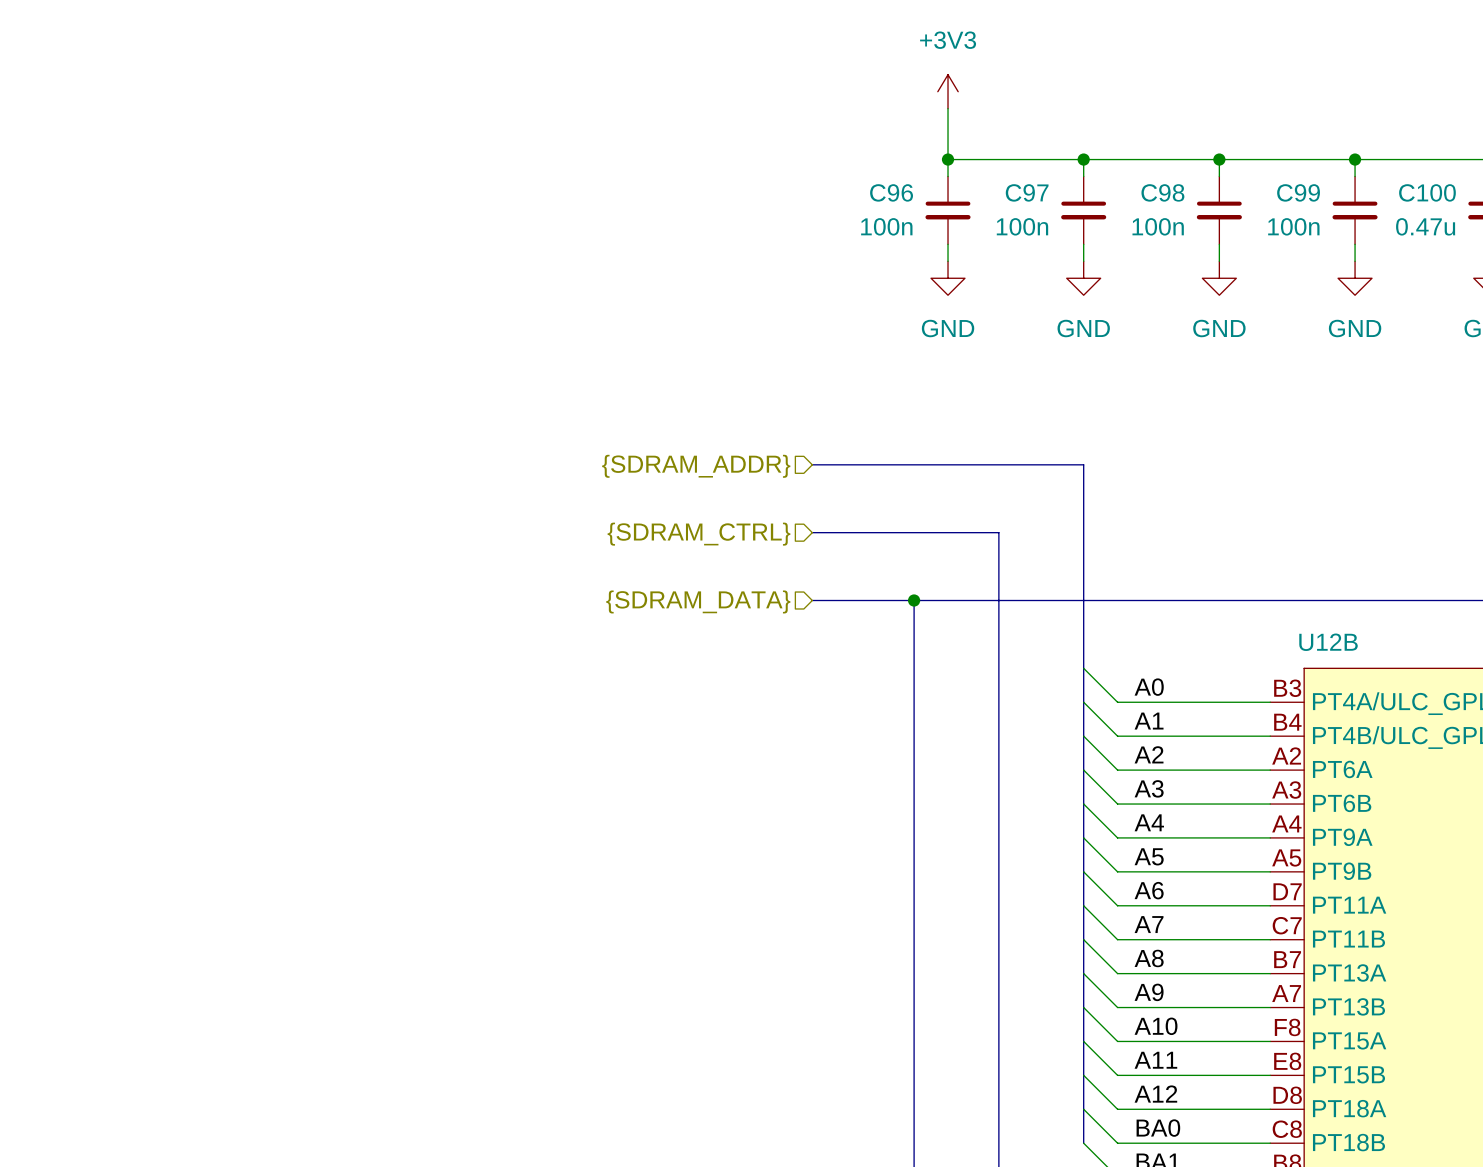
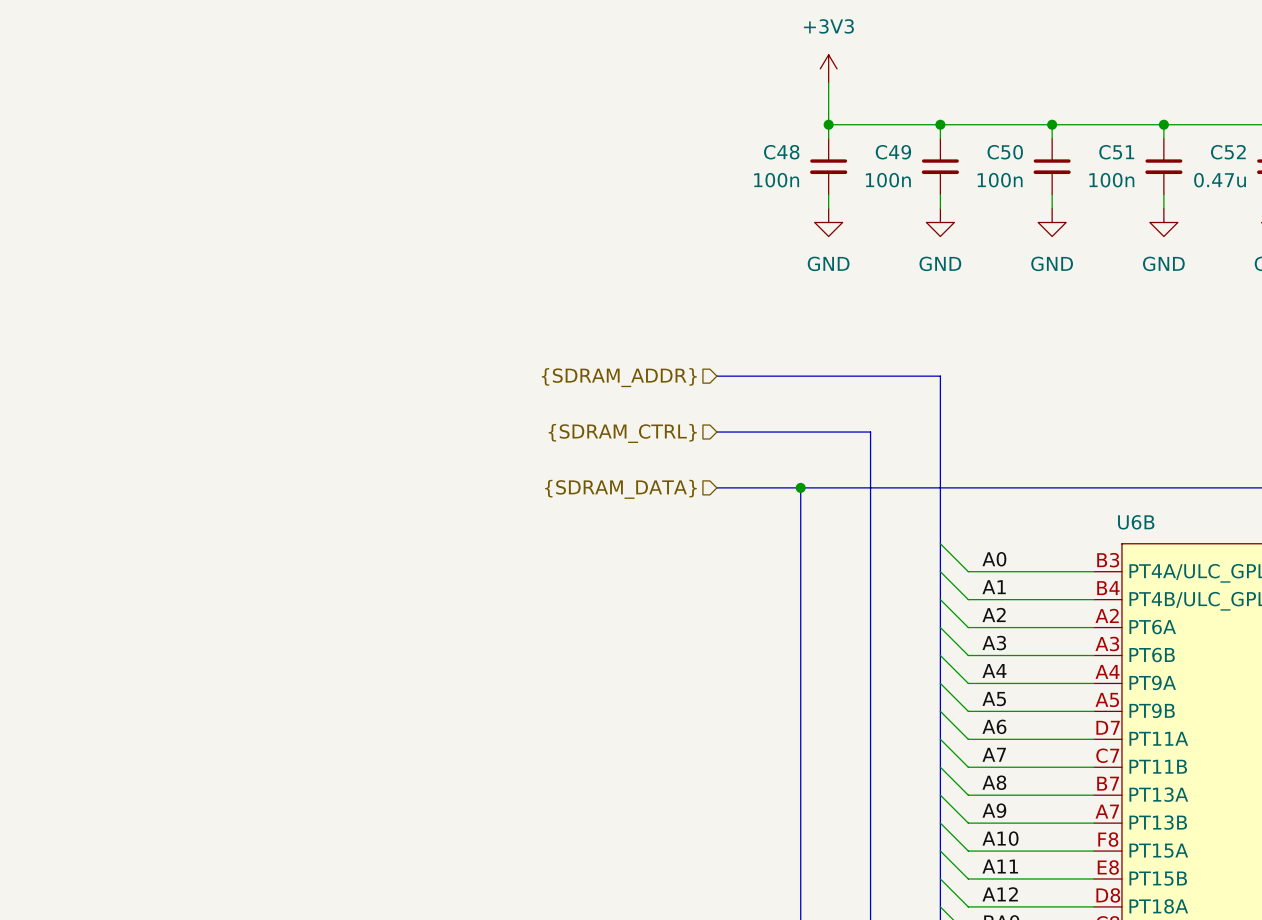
C96 name: C96 (891, 192) -> C48 (781, 152)
C97 name: C97 (1027, 192) -> C49 (893, 152)
C98 name: C98 (1162, 192) -> C50 (1005, 152)
C99 name: C99 (1298, 192) -> C51 (1116, 152)
C100 name: C100 (1427, 192) -> C52 (1228, 152)
U12B name: U12B (1328, 642) -> U6B (1136, 522)

